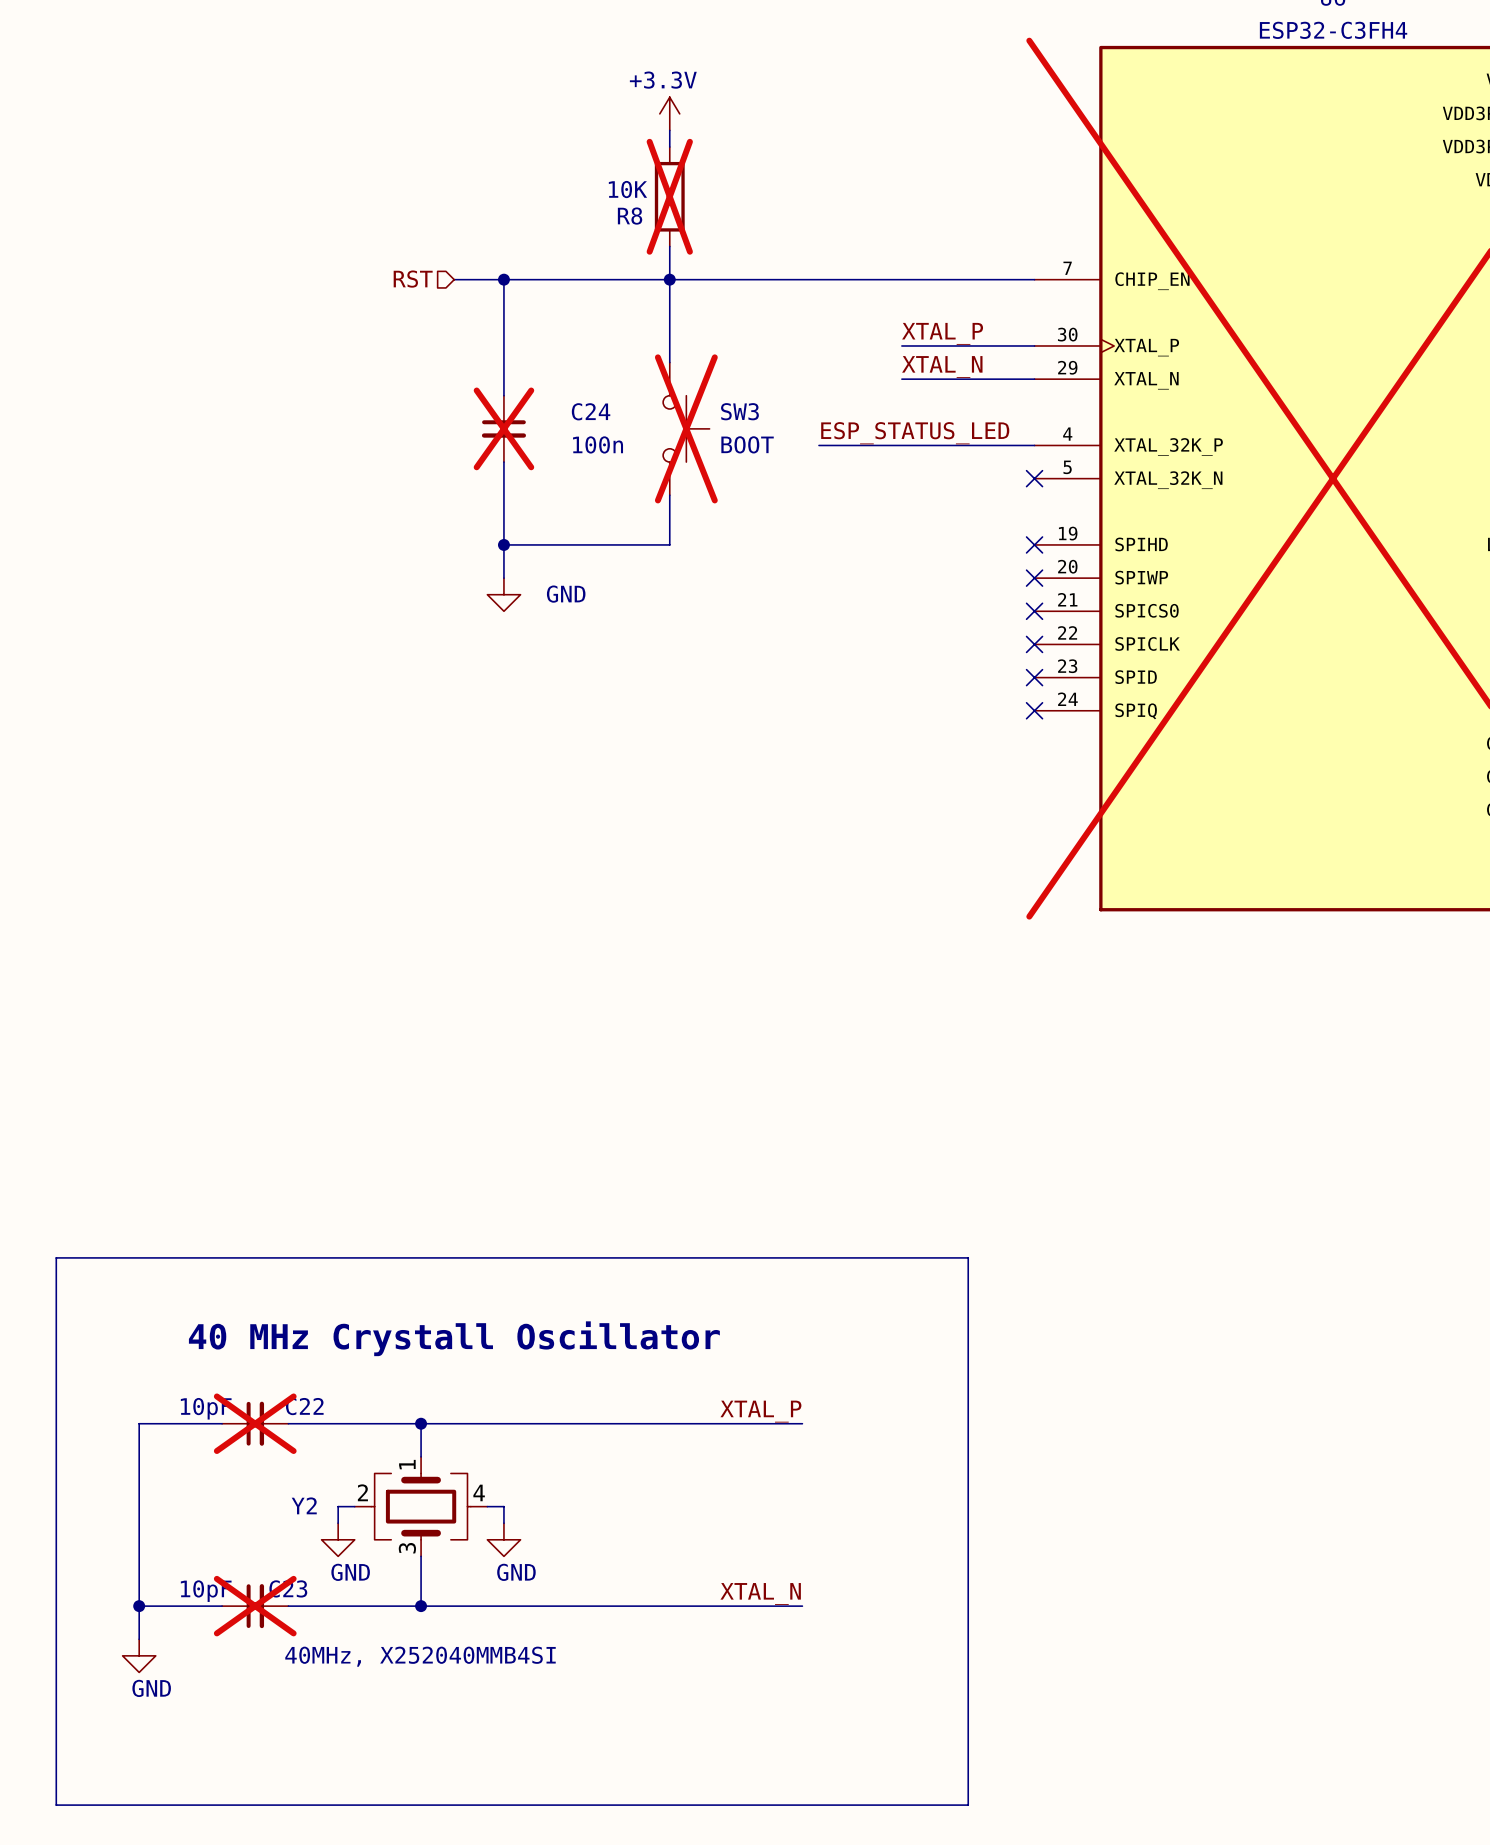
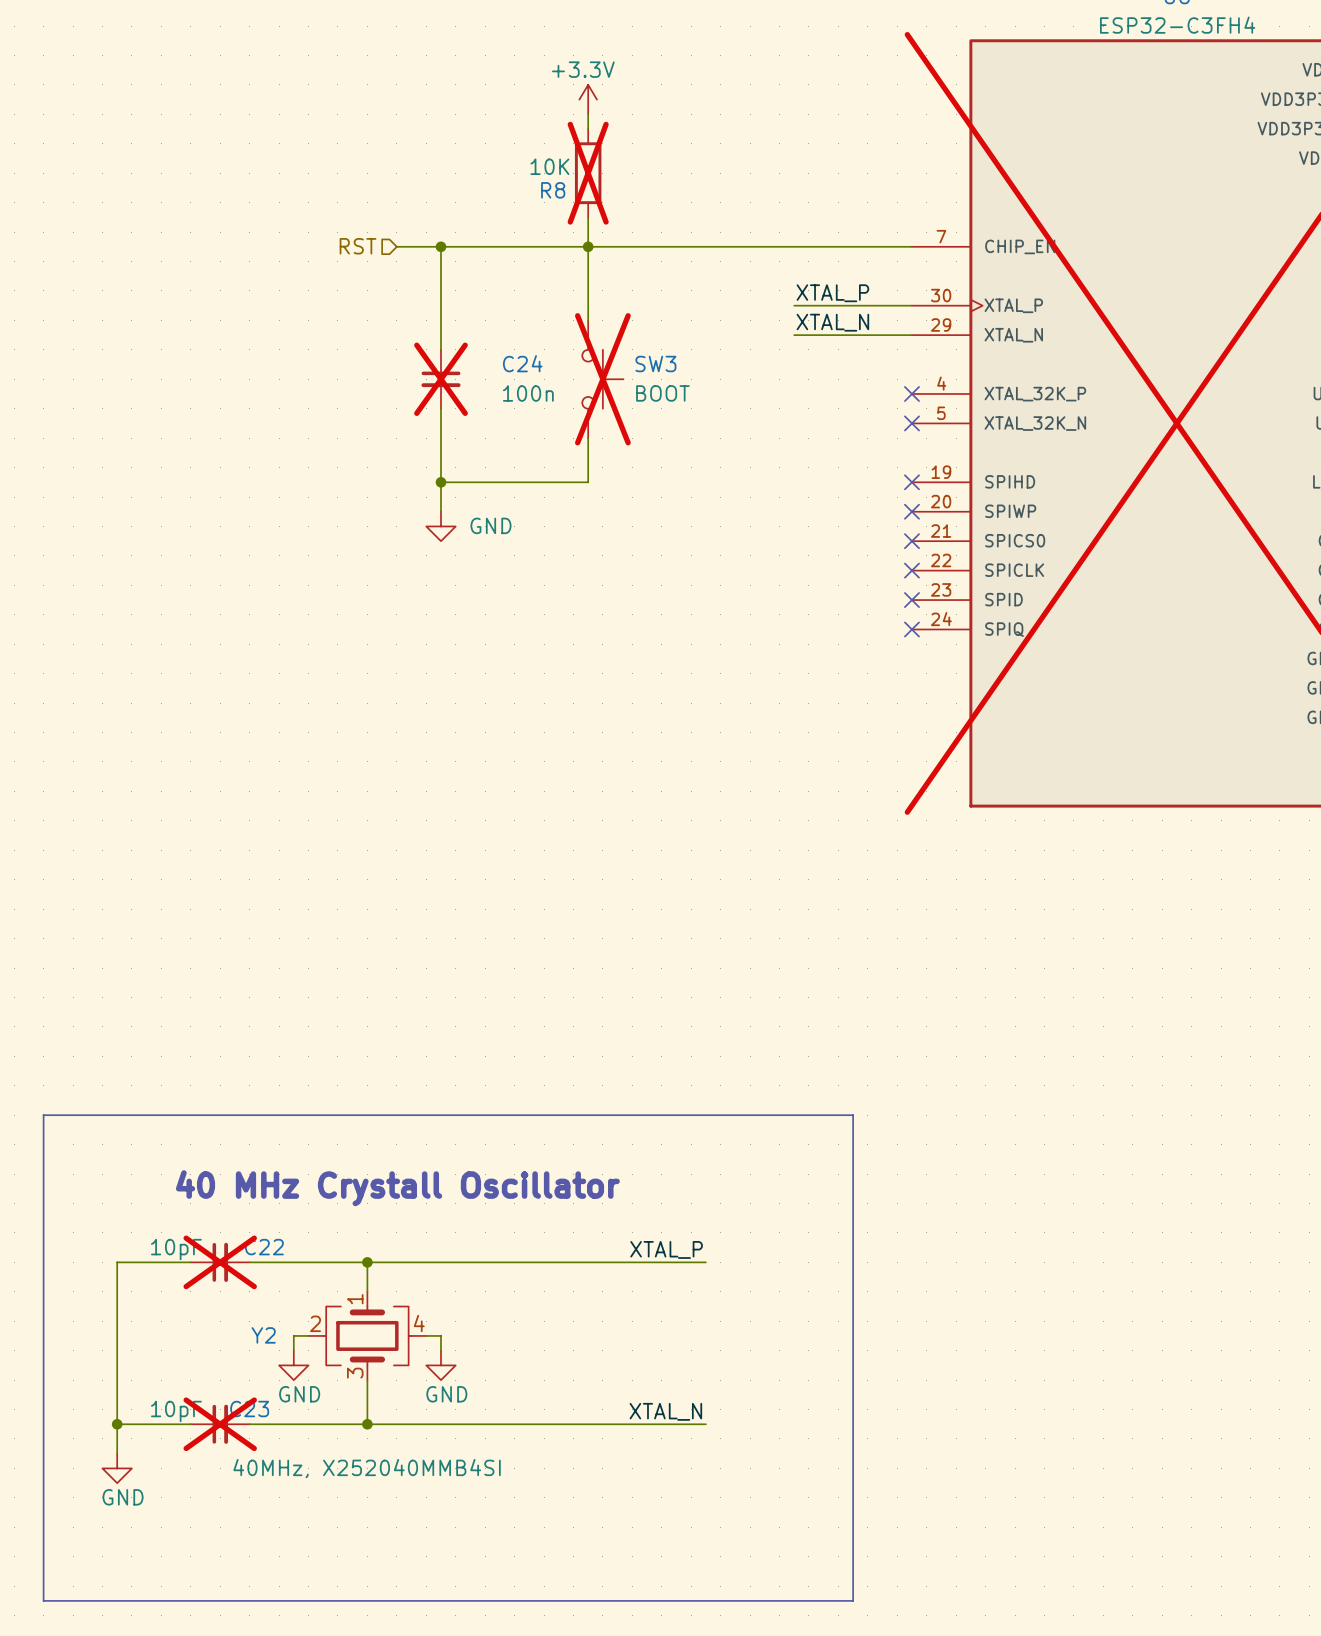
label: ESP_STATUS_LED (915, 433) -> none
wire: (818, 445) (1034, 445) -> none
no-connect mark: none -> (911, 393)

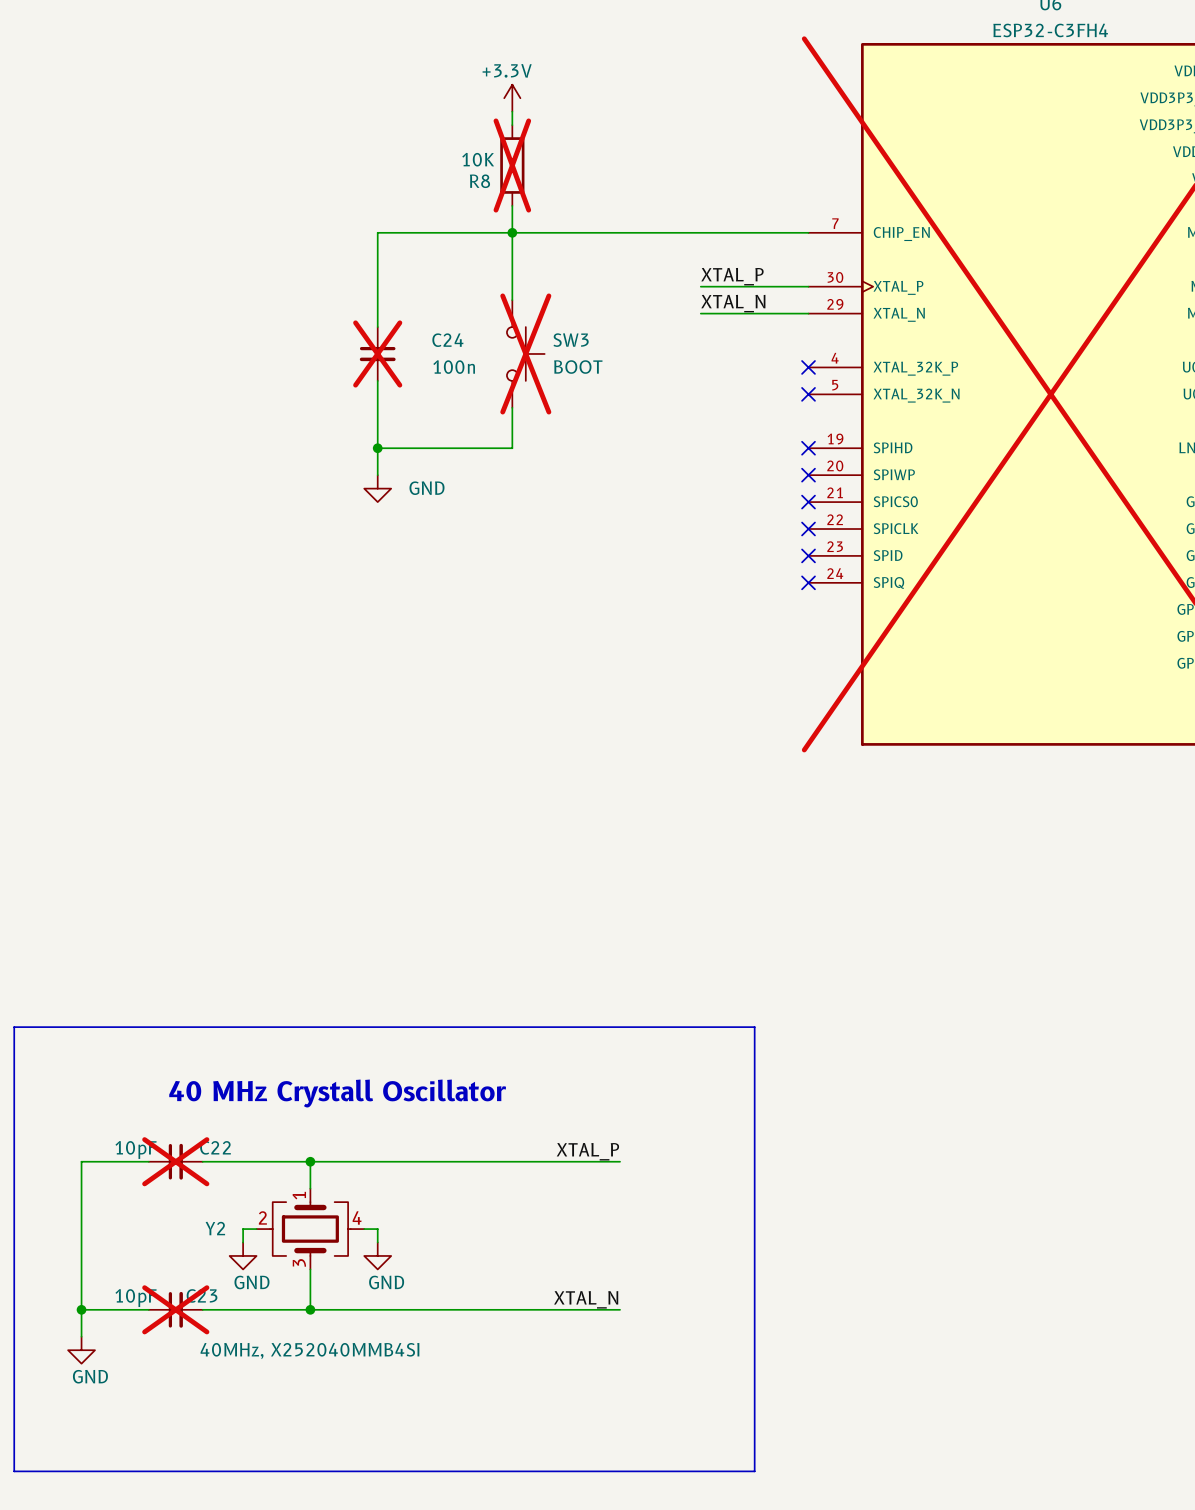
hierarchical label: RST (358, 246) -> none
wire: (396, 246) (440, 246) -> none
junction: (440, 246) -> none

